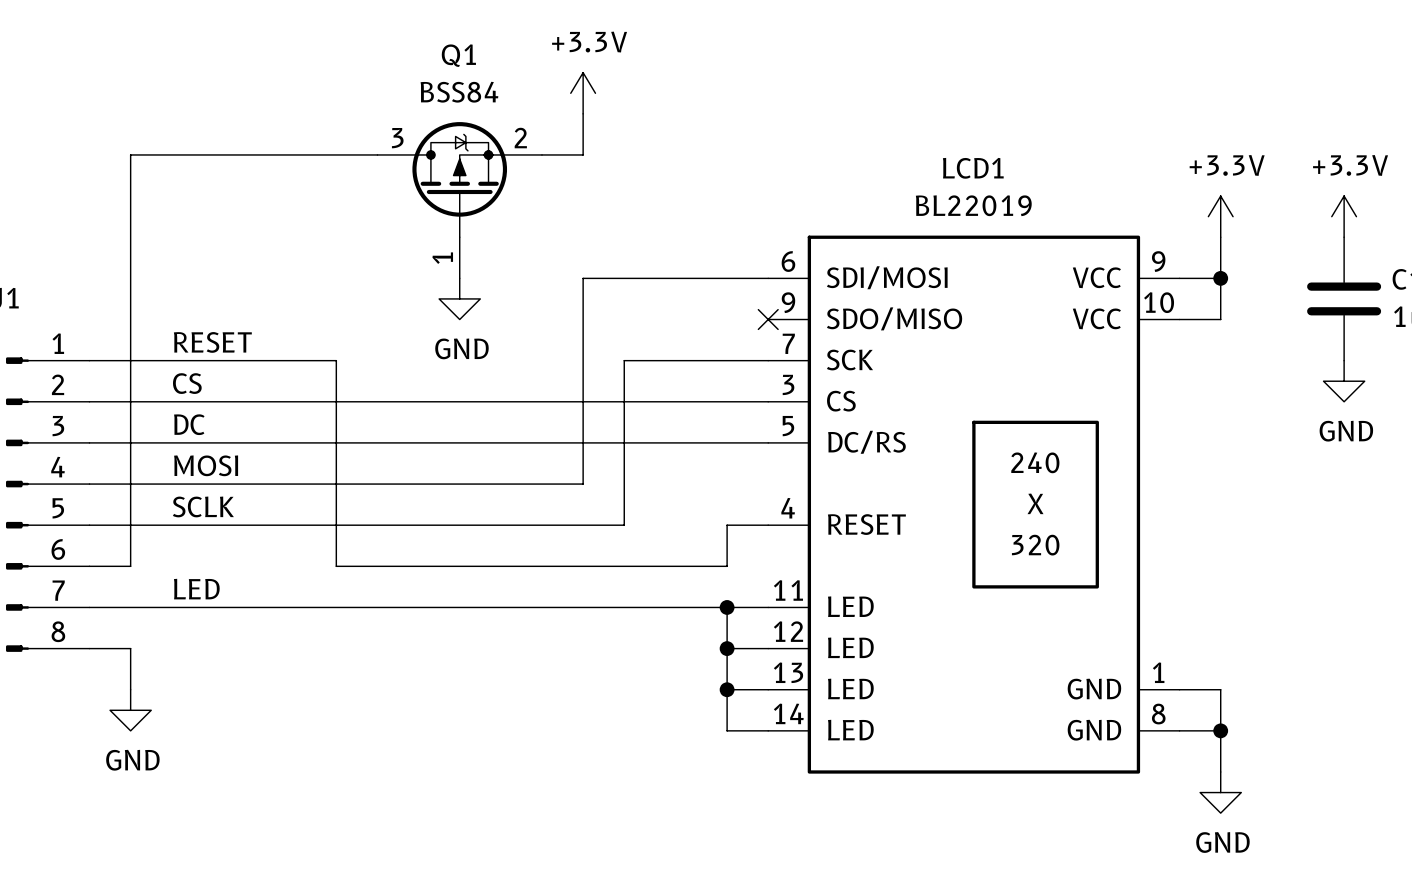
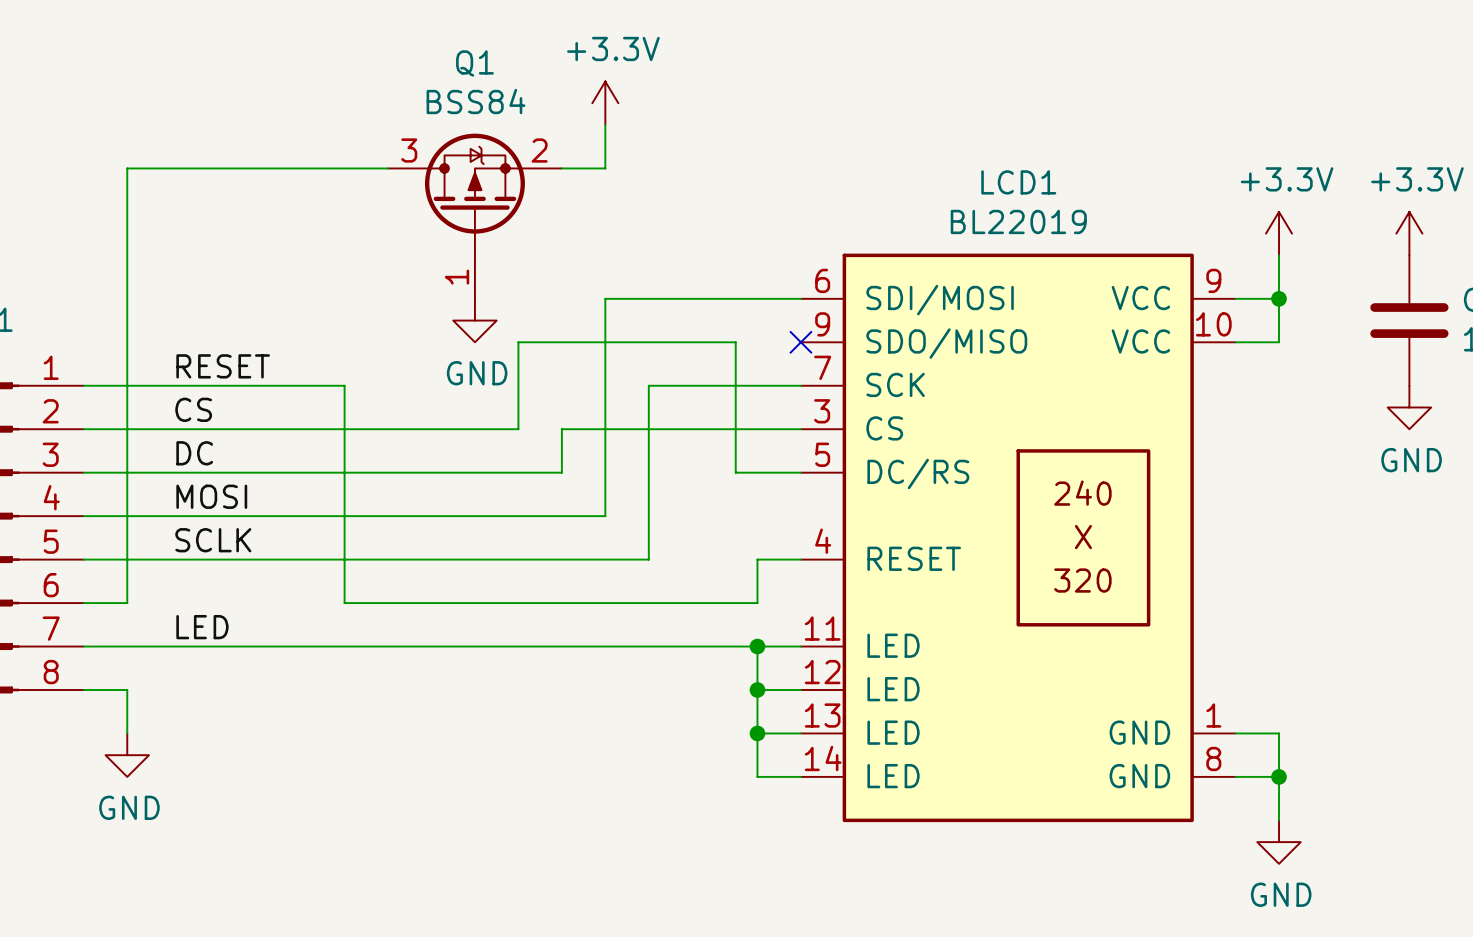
wire: (500, 401) (541, 401) -> (561, 472) (561, 429)
wire: (541, 442) (706, 442) -> (518, 429) (518, 342) (735, 342) (735, 472)

